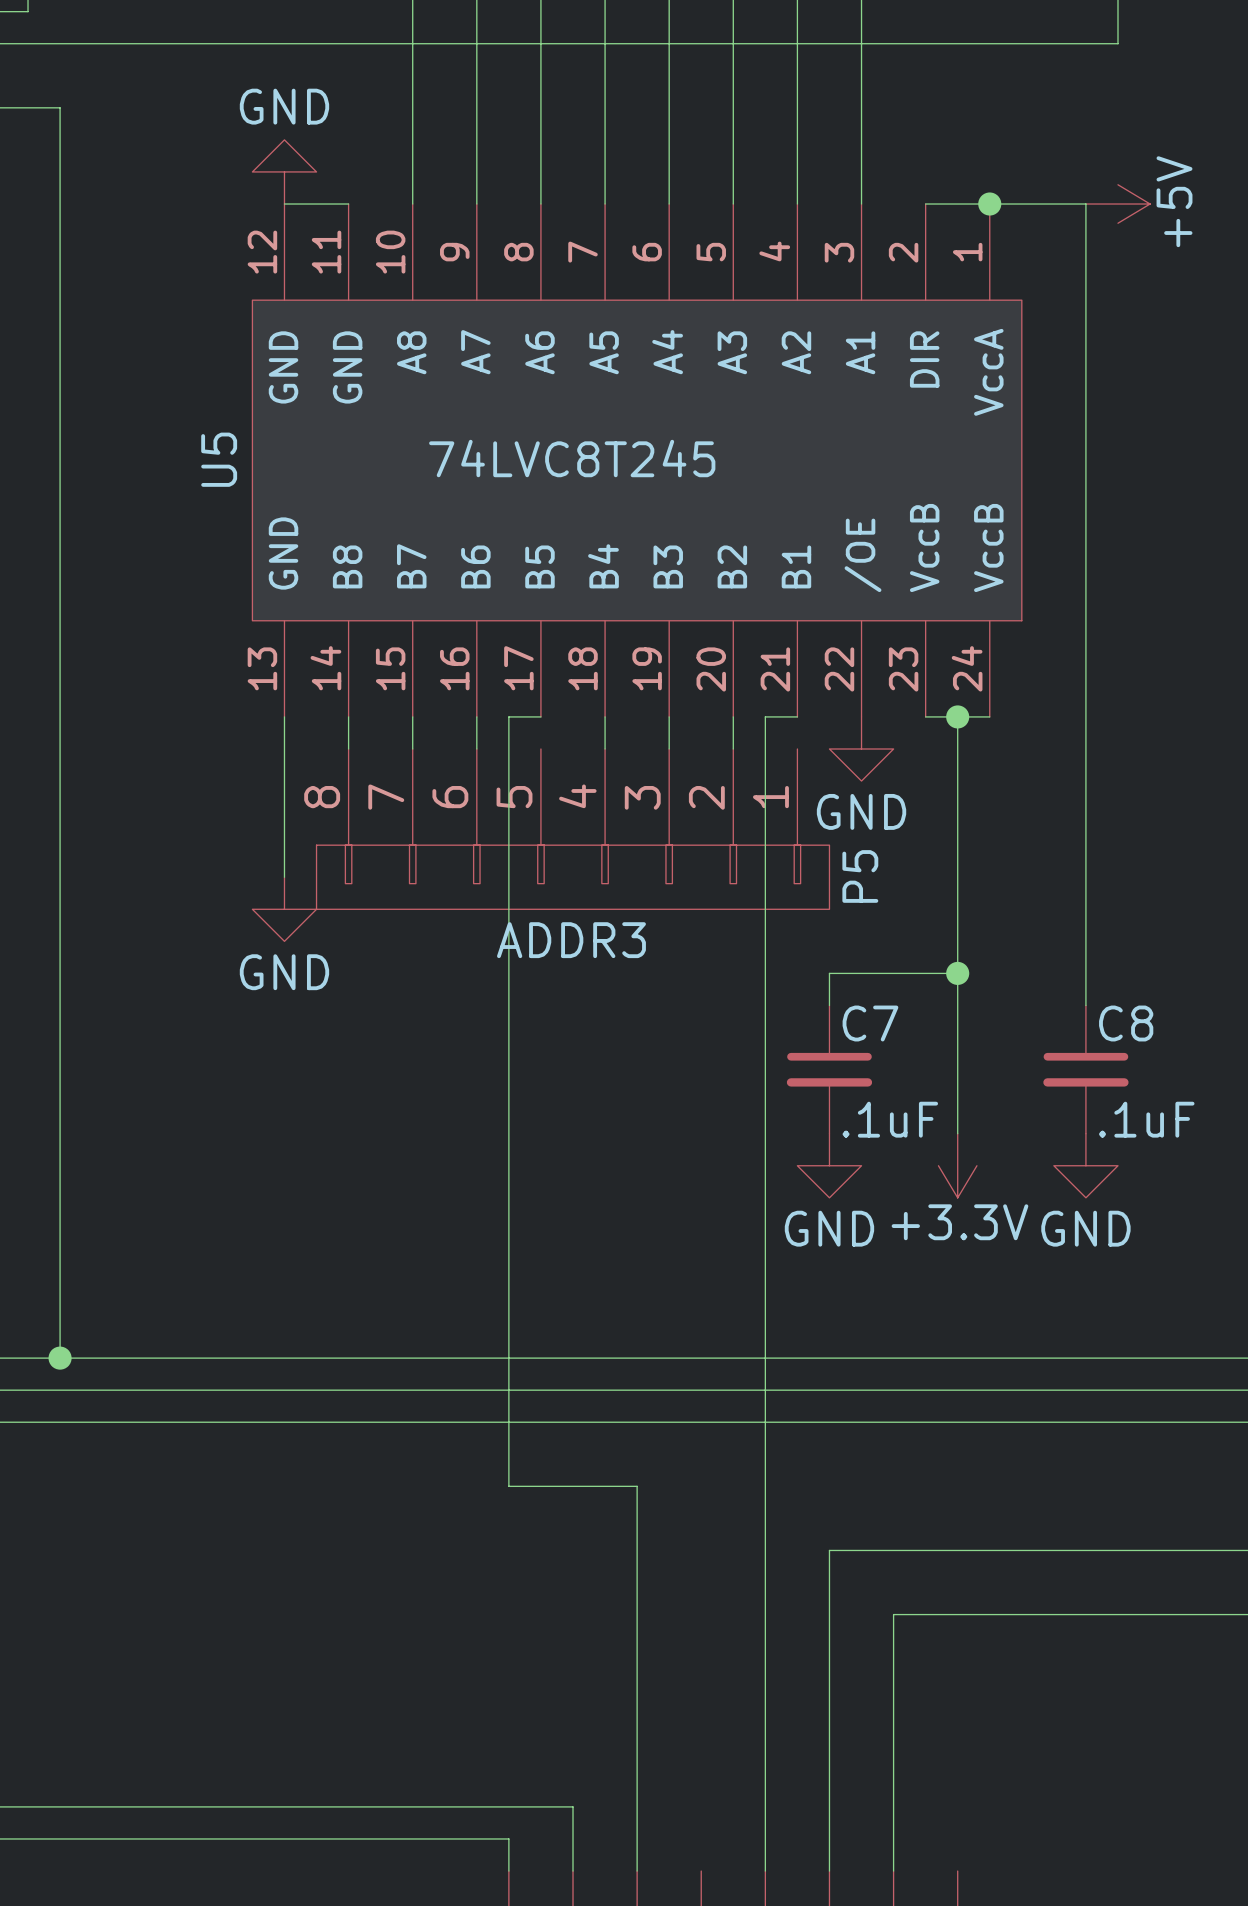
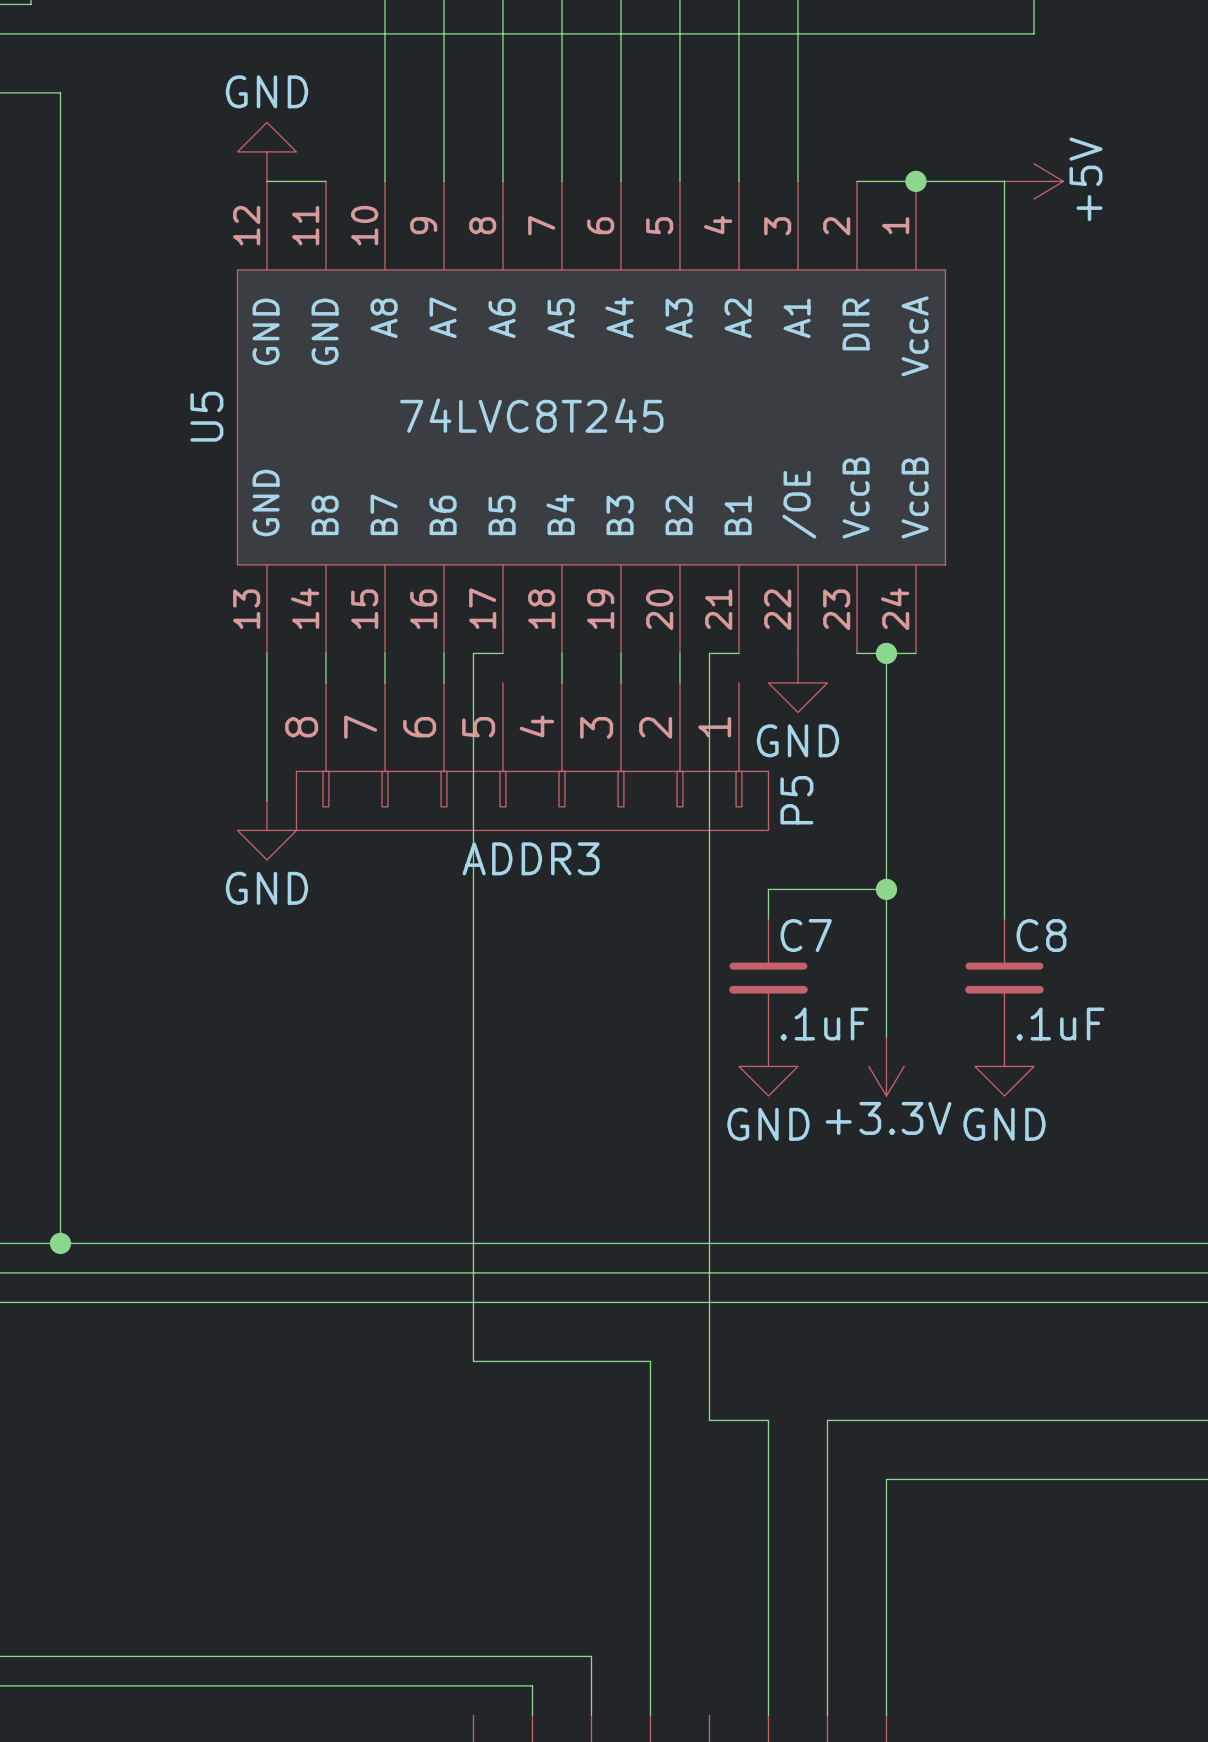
wire: (637, 1486) (637, 1806) -> (591, 1361) (650, 1361) (650, 1715)
wire: (765, 1550) (765, 1871) -> none
wire: (829, 1550) (893, 1550) -> (768, 1420) (709, 1420)
wire: (893, 1614) (957, 1614) -> (827, 1479) (827, 1420)
wire: none -> (886, 1479) (886, 1715)
wire: (573, 1806) (573, 1838) -> (532, 1656) (591, 1656)
wire: (508, 1838) (508, 1871) -> (473, 1685) (532, 1685)

